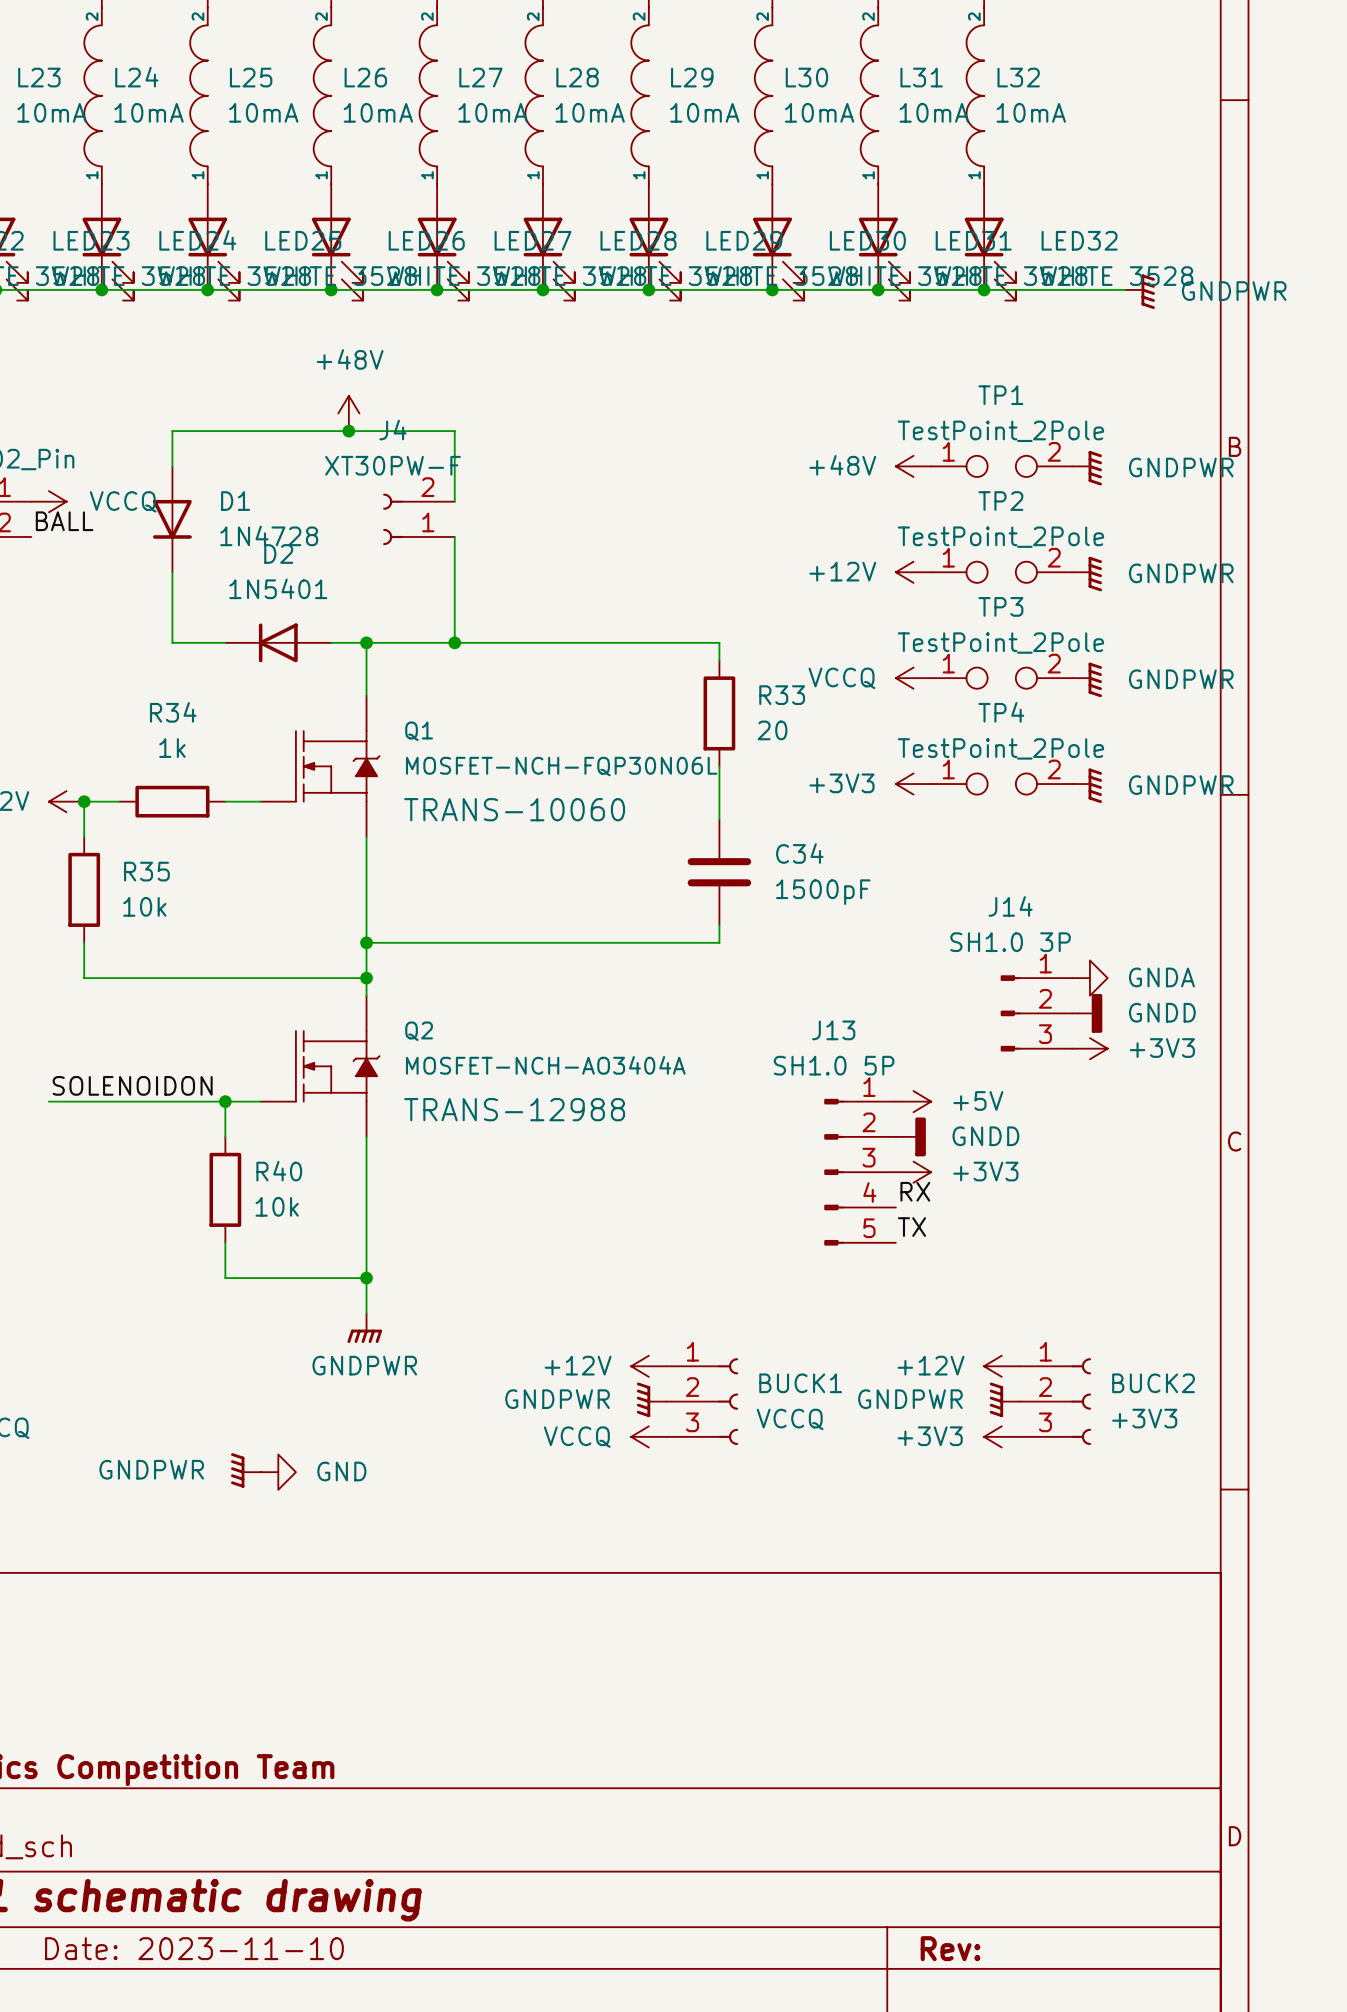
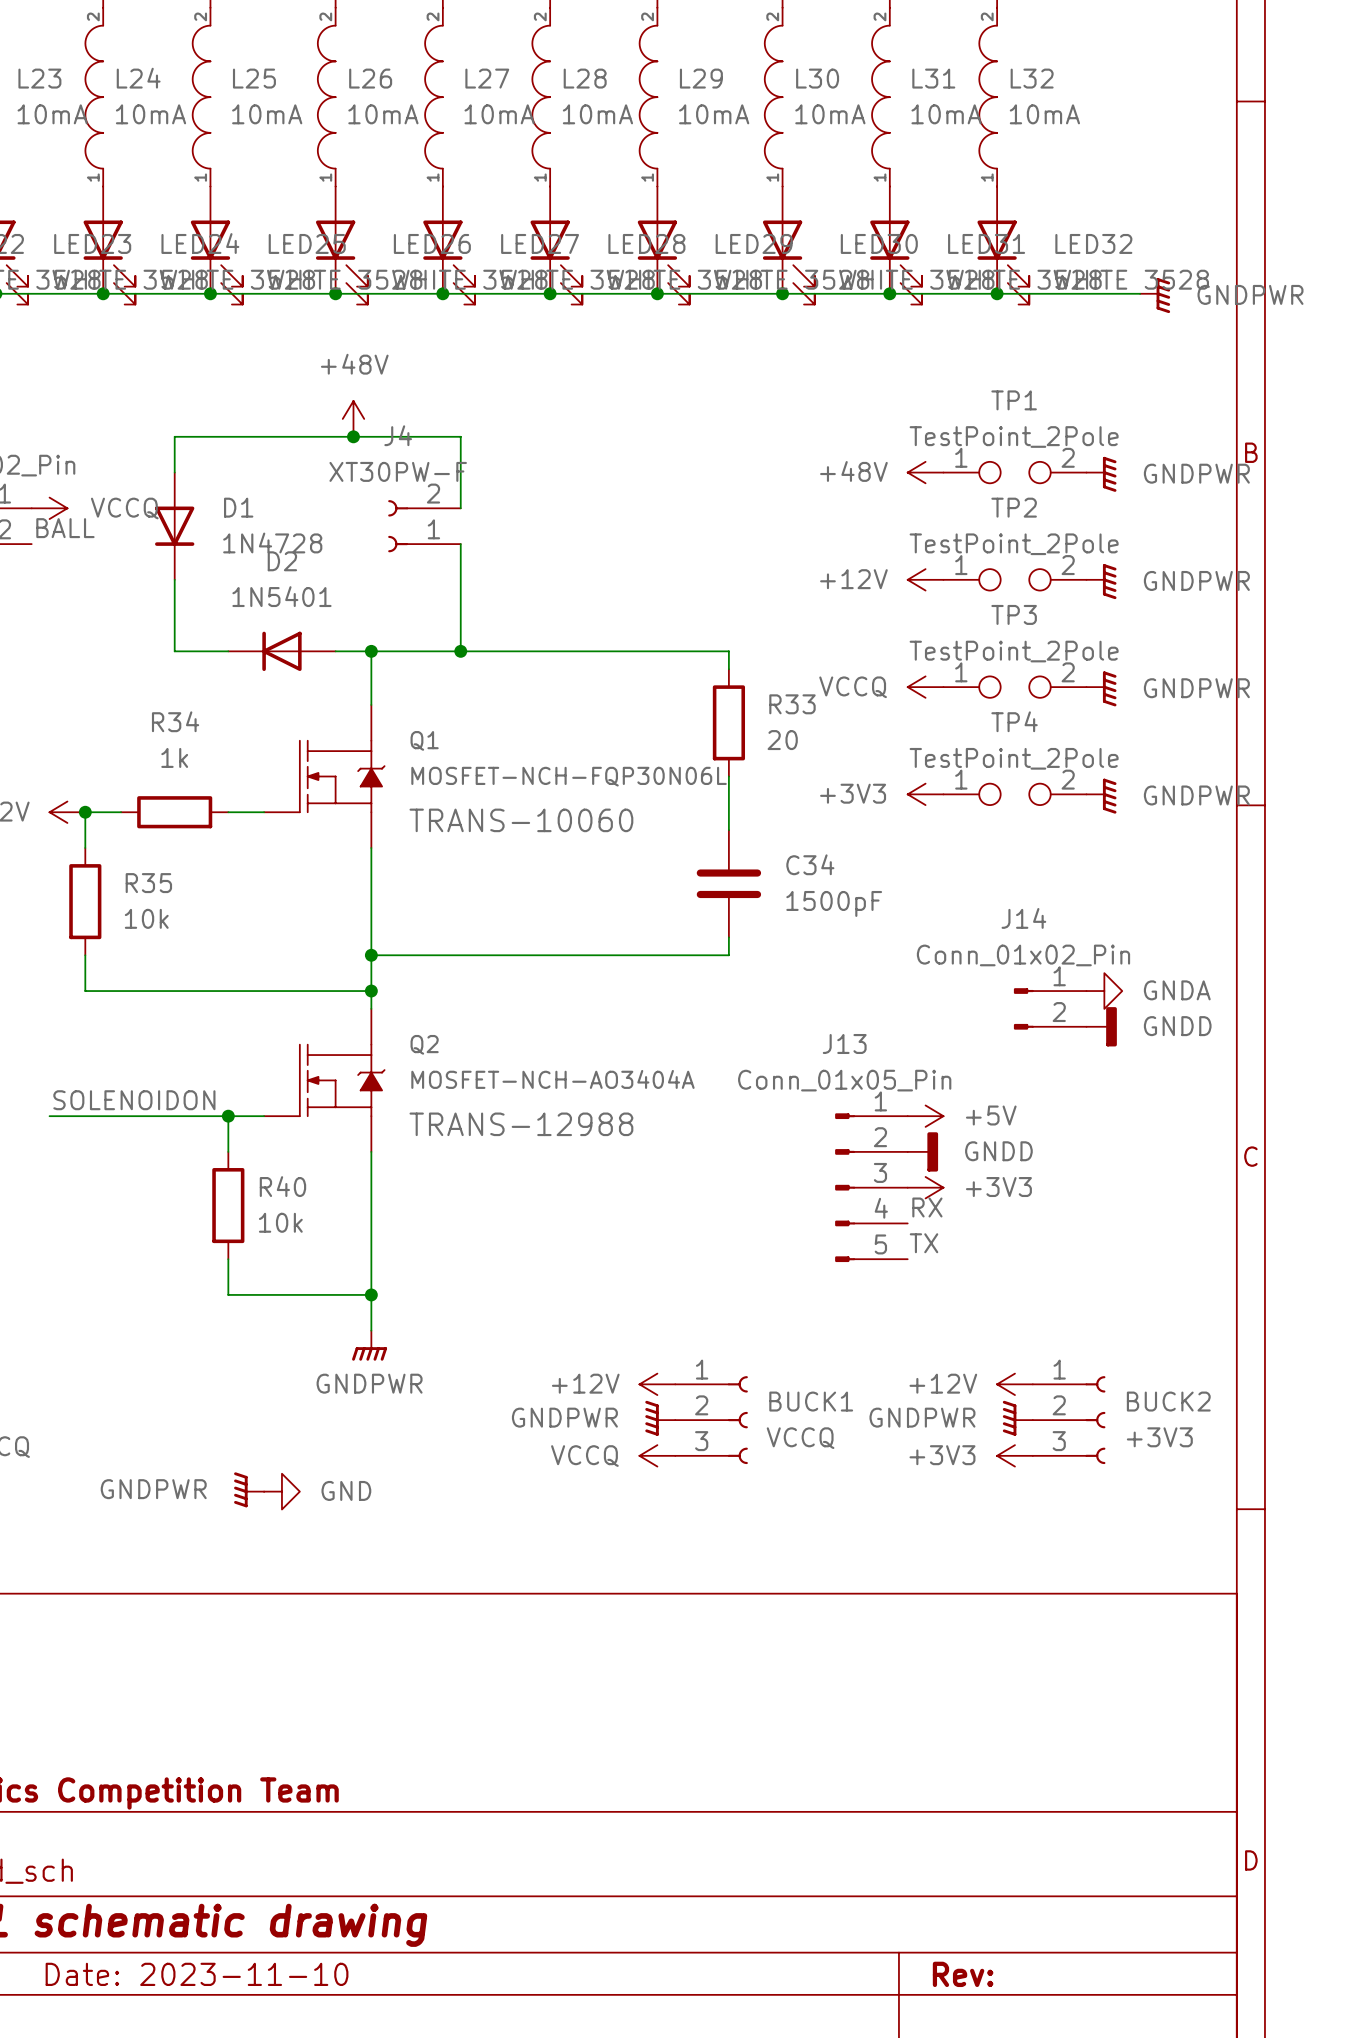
J14 value: SH1.0 3P (1010, 942) -> Conn_01x02_Pin (1023, 955)
J14 symbol: [1000, 975, 1073, 1052] -> [1013, 988, 1087, 1030]
power symbol: +3V3 (1089, 1048) -> none
J13 value: SH1.0 5P (834, 1065) -> Conn_01x05_Pin (844, 1080)

